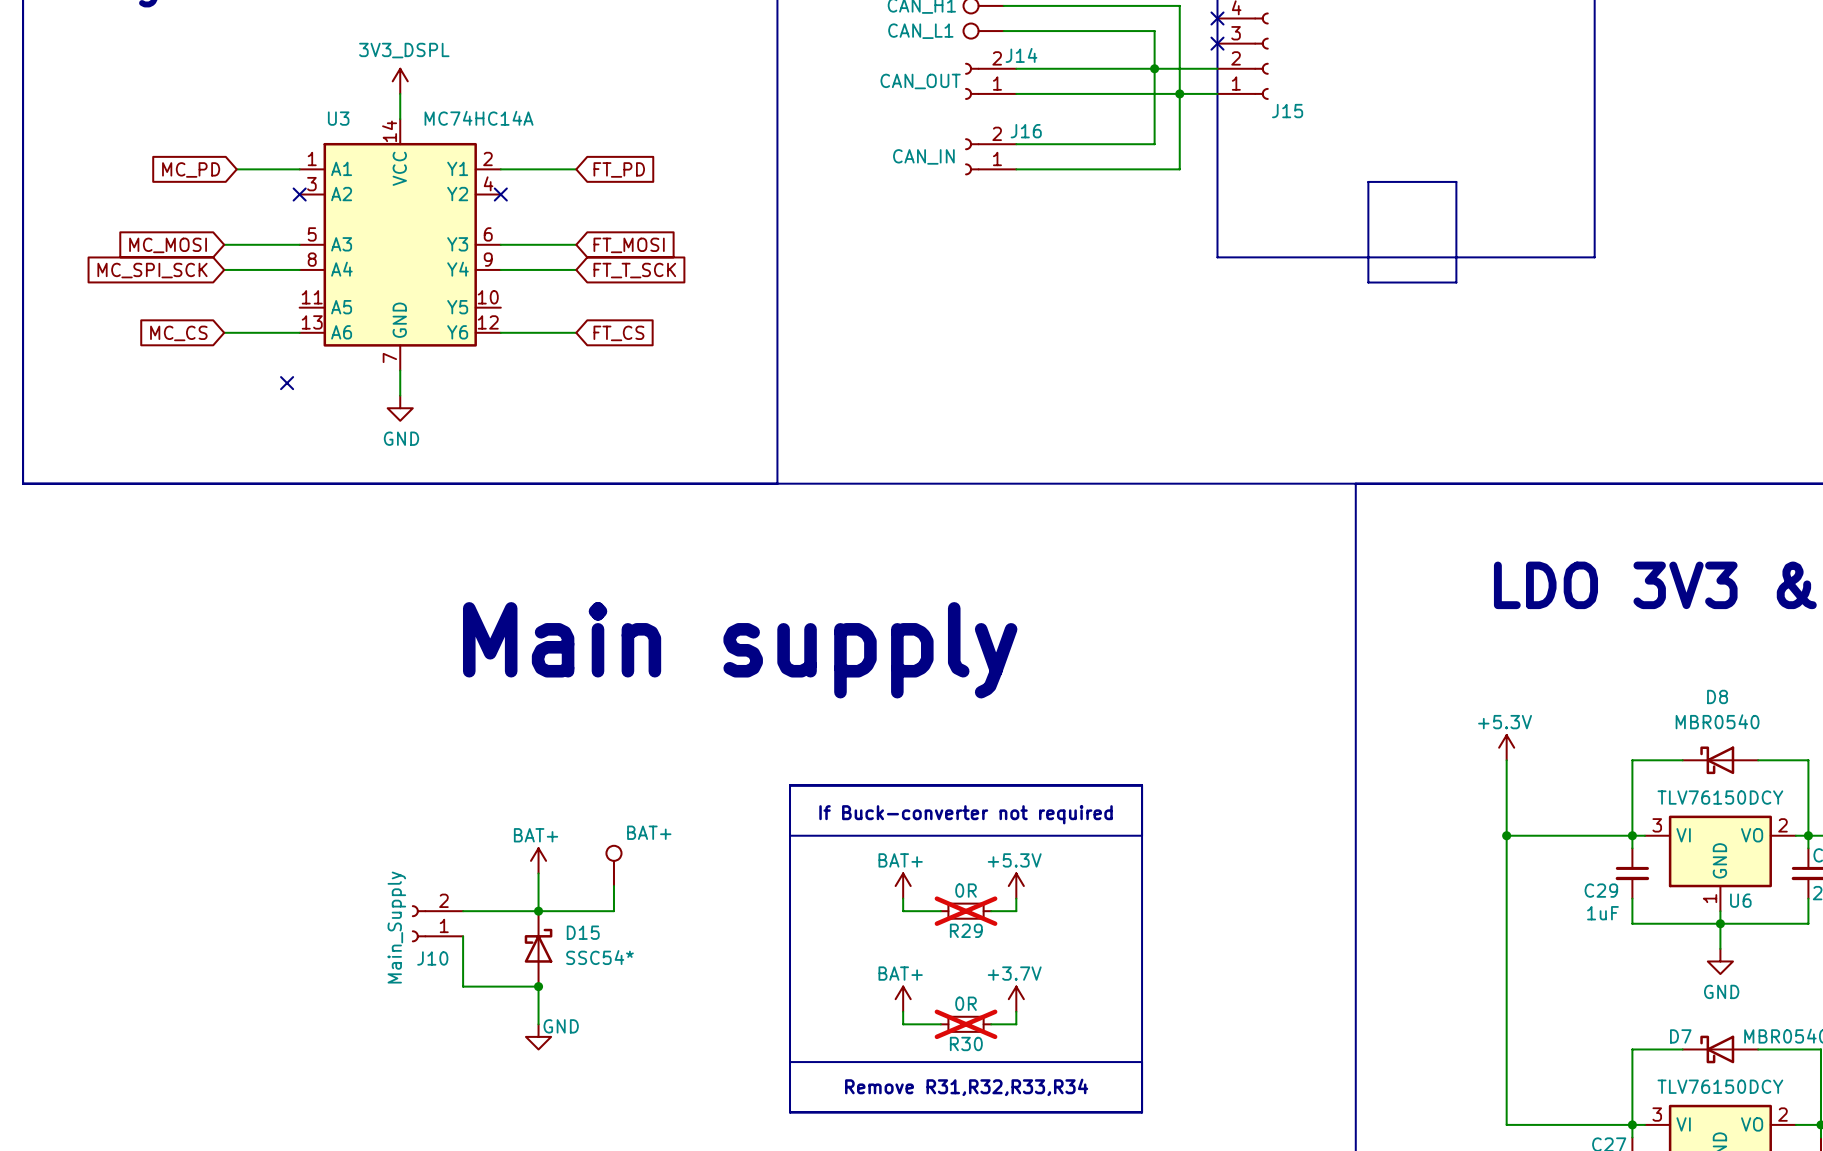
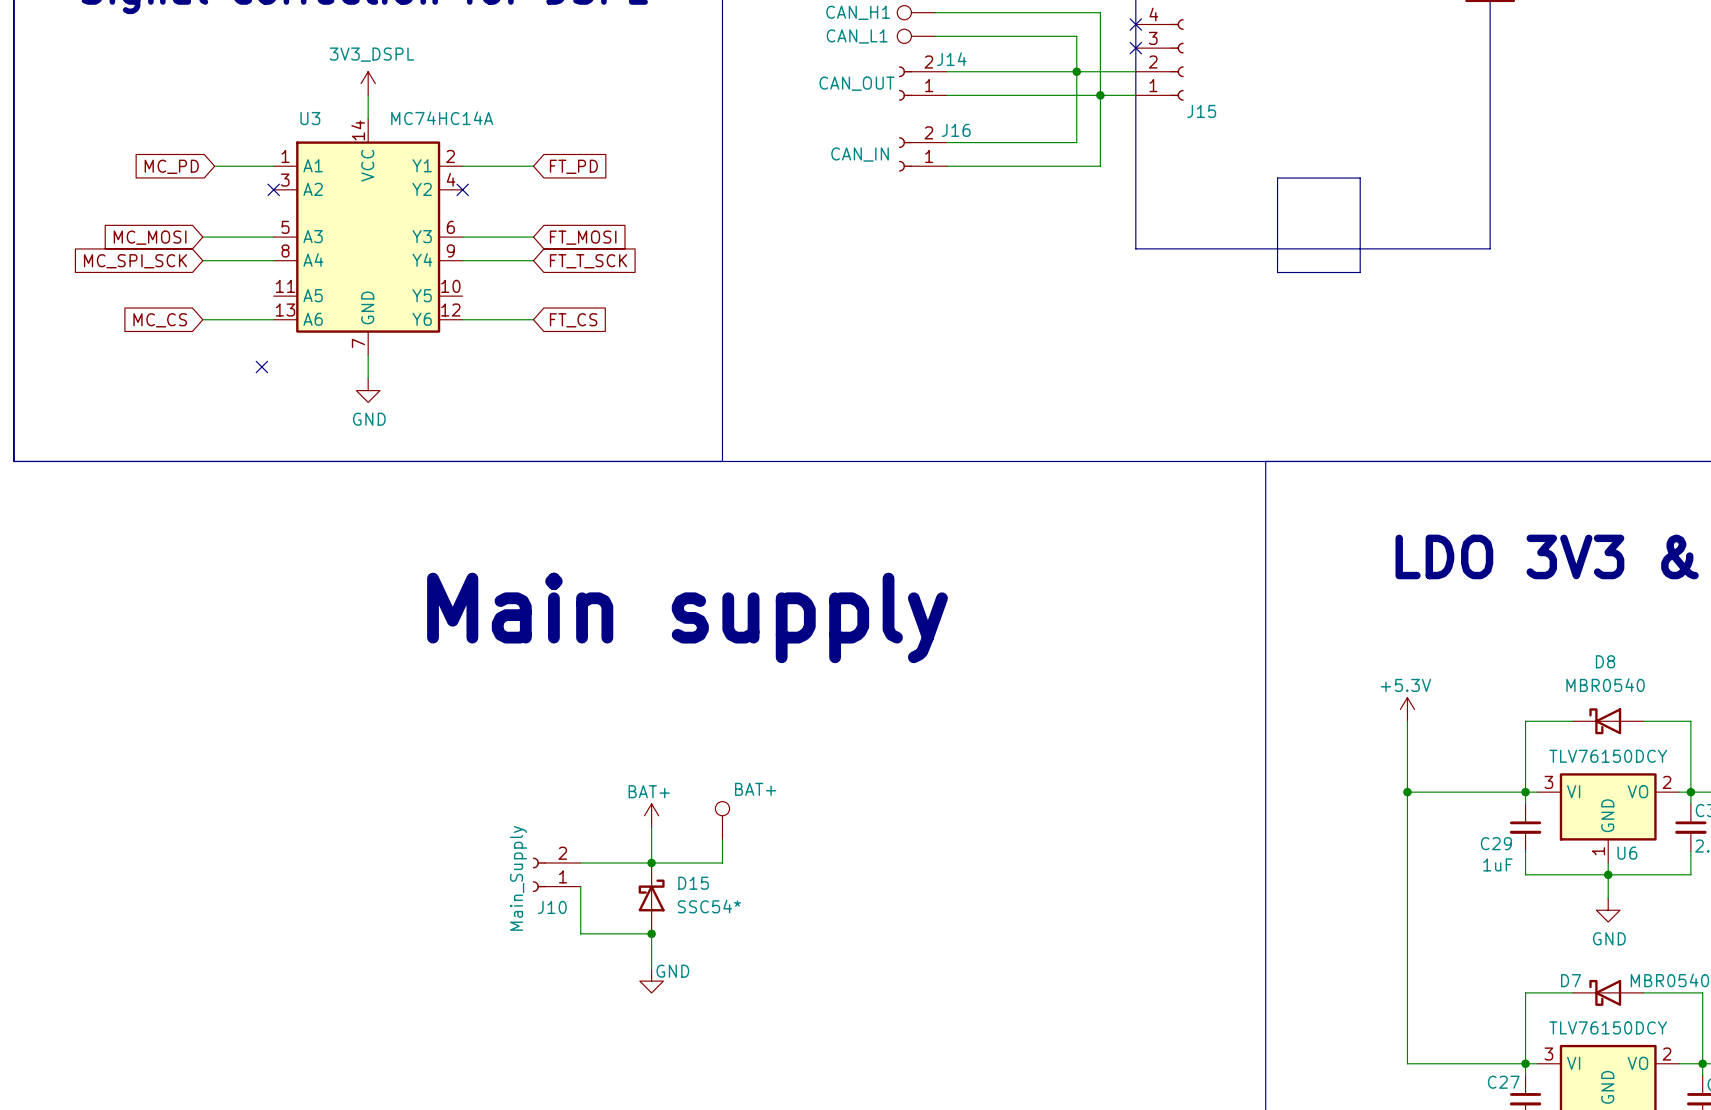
line: (790, 785) (1142, 785) (1142, 1112) (790, 1112) (790, 785) -> none
text: If Buck-converter not required (966, 814) -> none
line: (790, 835) (1142, 835) -> none
power symbol: BAT+ (538, 860) -> none
power symbol: none -> BAT+ (651, 815)
part position: (613, 865) -> (722, 820)
wire: (538, 873) (538, 911) -> (651, 827) (651, 863)
wire: (613, 886) (613, 911) (463, 911) -> (722, 839) (722, 863) (580, 863)
power symbol: BAT+ (903, 886) -> none
power symbol: +5.3V (1016, 886) -> none
wire: (903, 898) (903, 911) (940, 911) -> none
wire: (1016, 898) (1016, 911) (991, 911) -> none
junction: (538, 911) -> none
junction: none -> (651, 863)
R29: 0R (966, 911) -> none
J10 position: (437, 923) -> (556, 874)
wire: (463, 936) (463, 986) (538, 986) (538, 1024) -> (580, 886) (580, 933) (651, 933) (651, 969)
D15 position: (538, 948) -> (651, 898)
junction: (538, 986) -> none
junction: none -> (651, 933)
power symbol: BAT+ (903, 999) -> none
power symbol: +3.7V (1016, 999) -> none
wire: (903, 1011) (903, 1024) (940, 1024) -> none
wire: (1016, 1011) (1016, 1024) (991, 1024) -> none
R30: 0R (966, 1024) -> none
power symbol position: GND (538, 1036) -> GND (651, 981)
line: (790, 1062) (1142, 1062) -> none
text: Remove R31,R32,R33,R34 (966, 1087) -> none

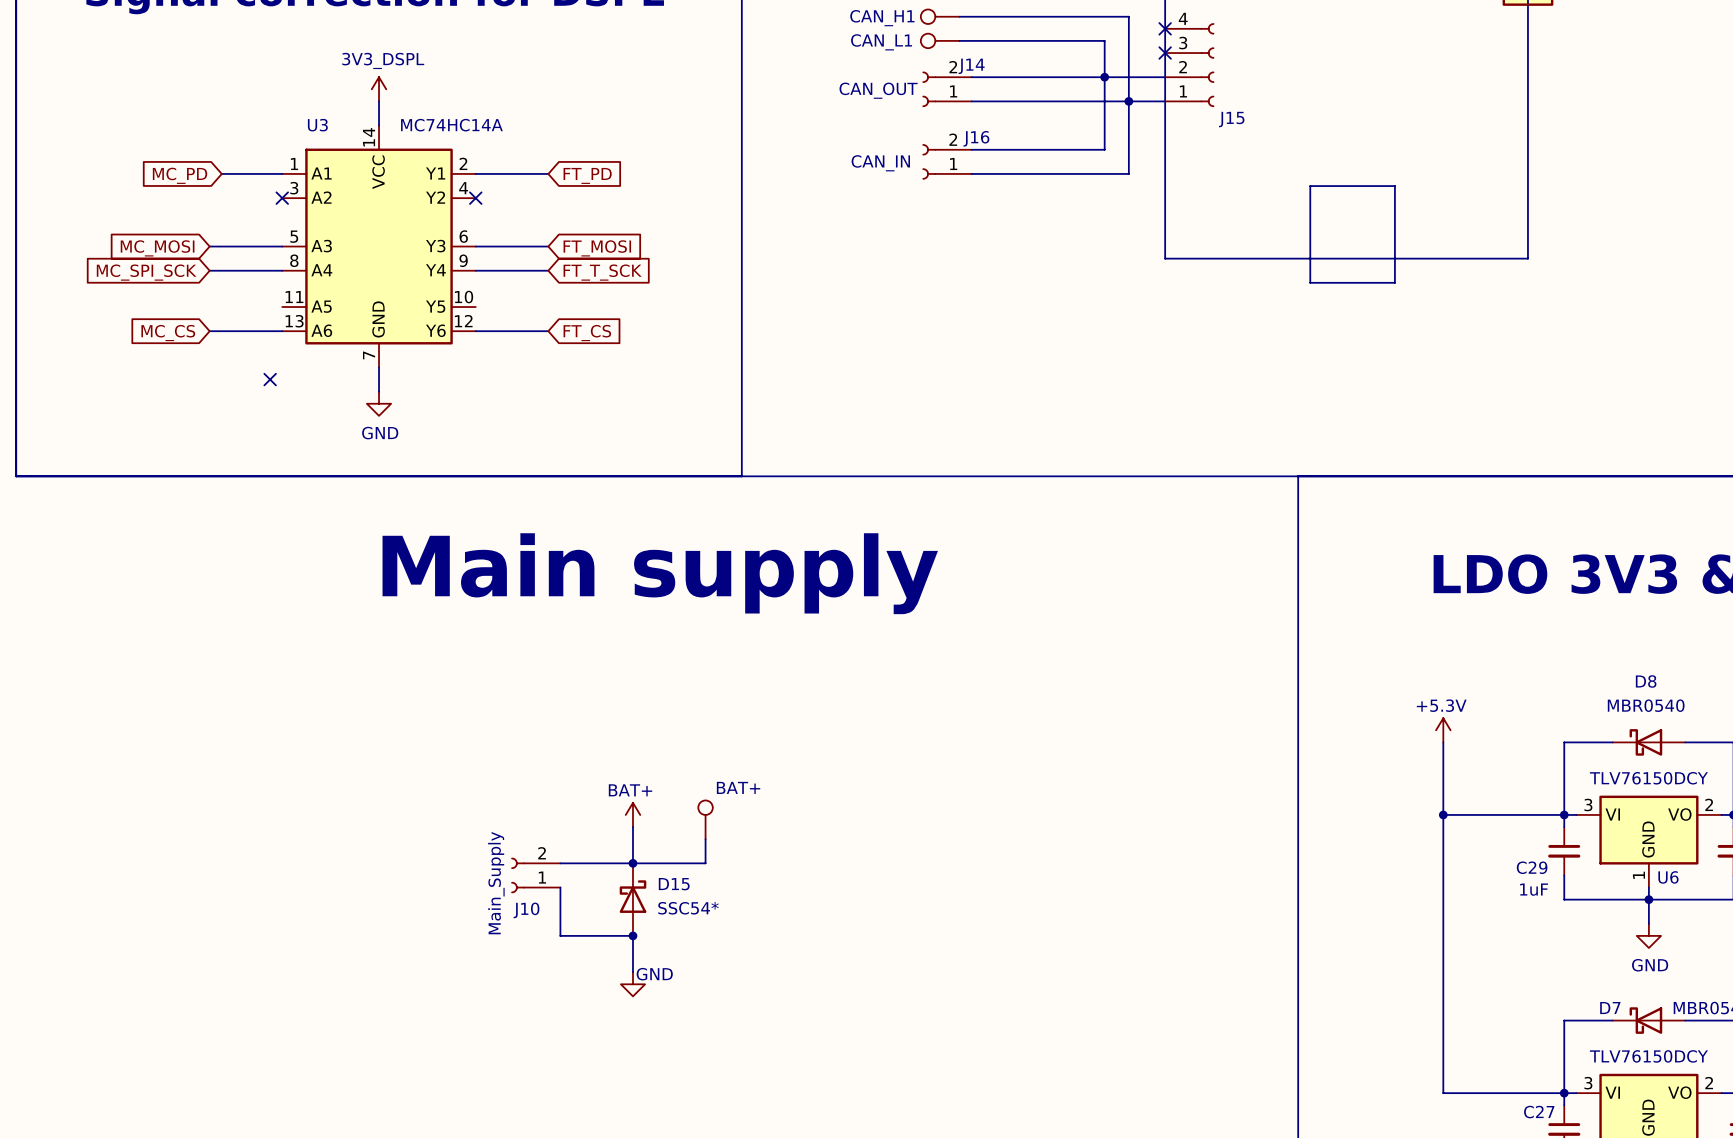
text position: Main supply (687, 617) -> Main supply (660, 573)
power symbol position: BAT+ (651, 815) -> BAT+ (632, 814)
part position: (722, 820) -> (705, 819)
wire: (651, 827) (651, 863) -> (632, 827) (632, 863)
junction: none -> (632, 863)
wire: (722, 839) (722, 863) (580, 863) -> (705, 839) (705, 863) (560, 863)
junction: (651, 863) -> none
J10 position: (556, 874) -> (535, 875)
wire: (580, 886) (580, 933) (651, 933) (651, 969) -> (560, 887) (560, 935) (632, 935) (632, 972)
D15 position: (651, 898) -> (632, 899)
junction: none -> (632, 935)
junction: (651, 933) -> none
power symbol position: GND (651, 981) -> GND (632, 984)

